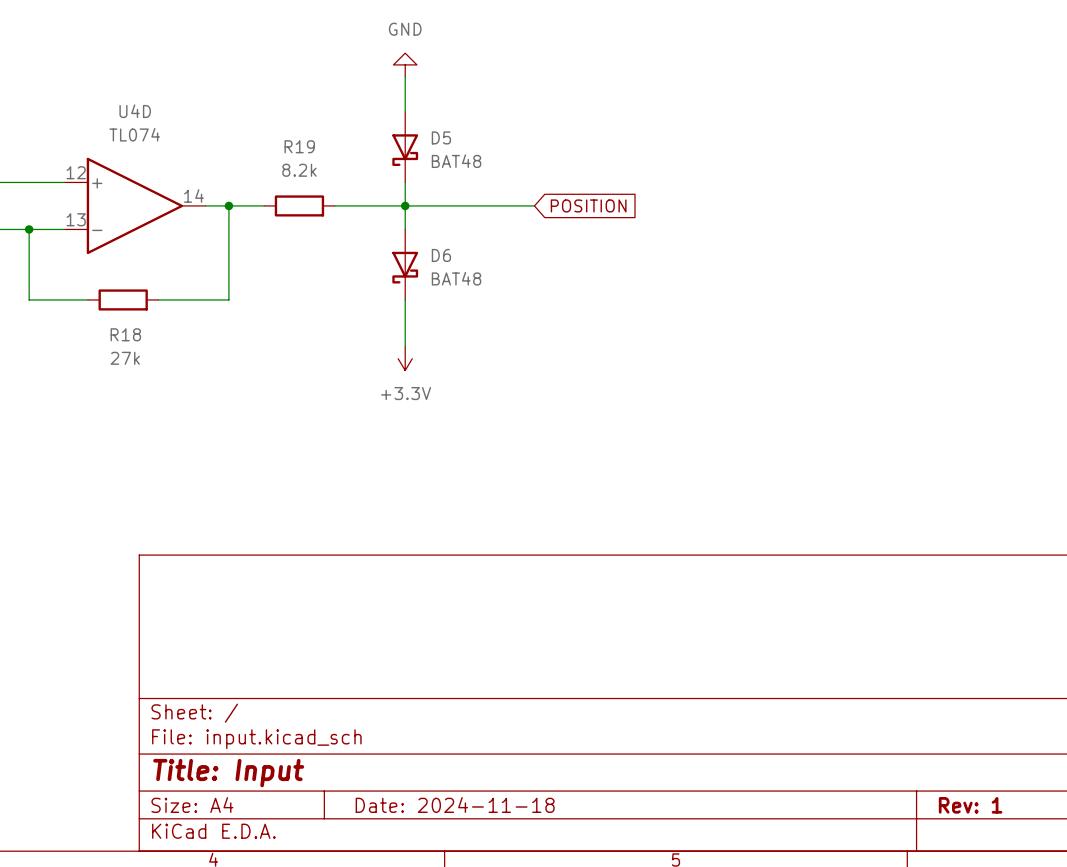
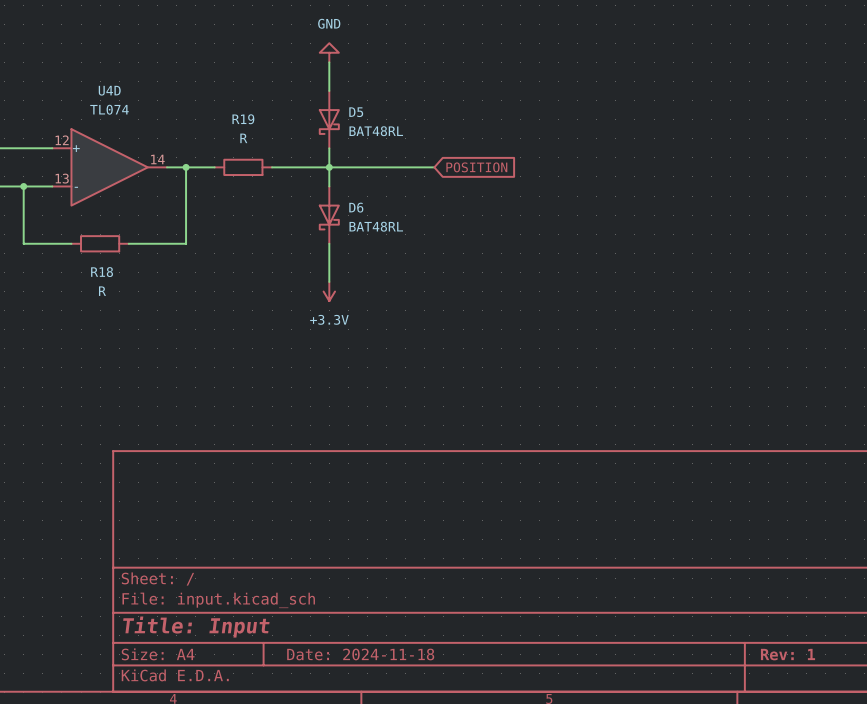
D5 value: BAT48 (456, 161) -> BAT48RL (376, 131)
R19 value: 8.2k (299, 170) -> R (243, 138)
D6 value: BAT48 (456, 278) -> BAT48RL (376, 226)
R18 value: 27k (125, 358) -> R (102, 291)

